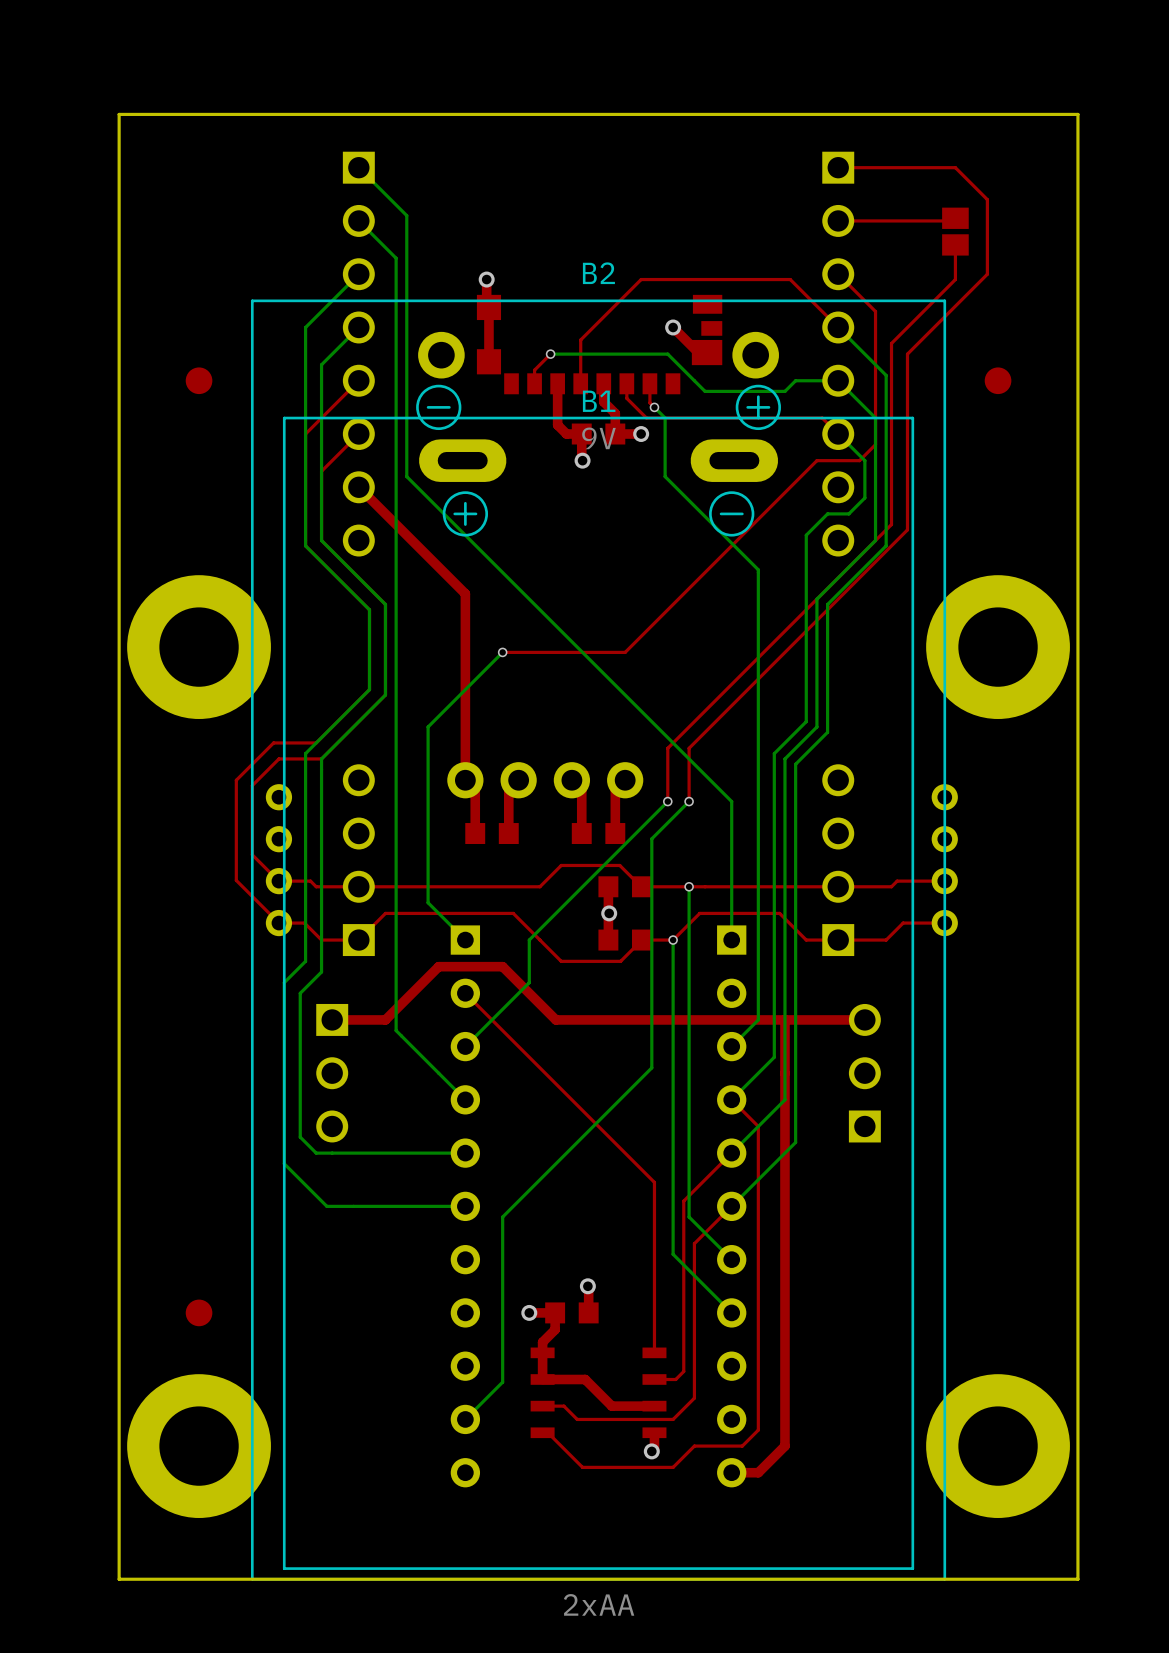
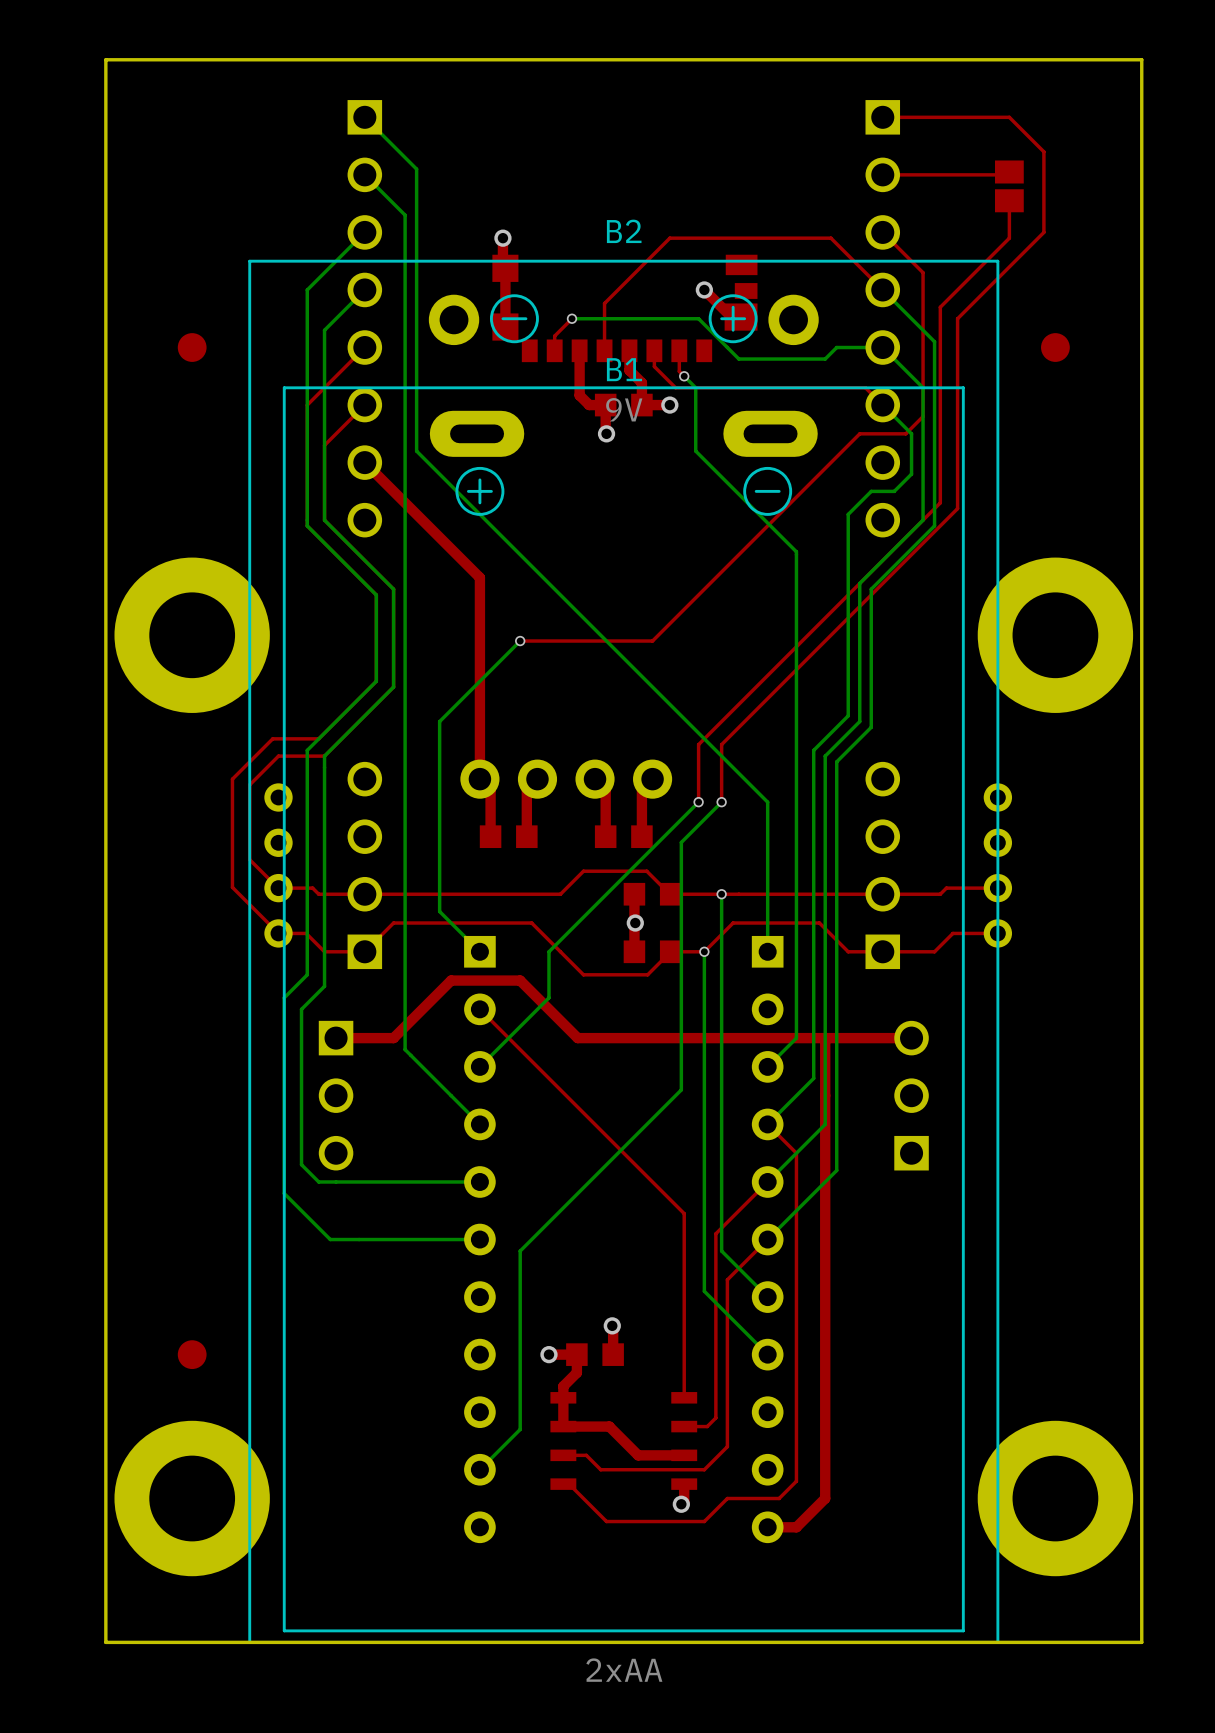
B2 footprint: [250, 299, 947, 1581] -> [248, 259, 1000, 1644]

